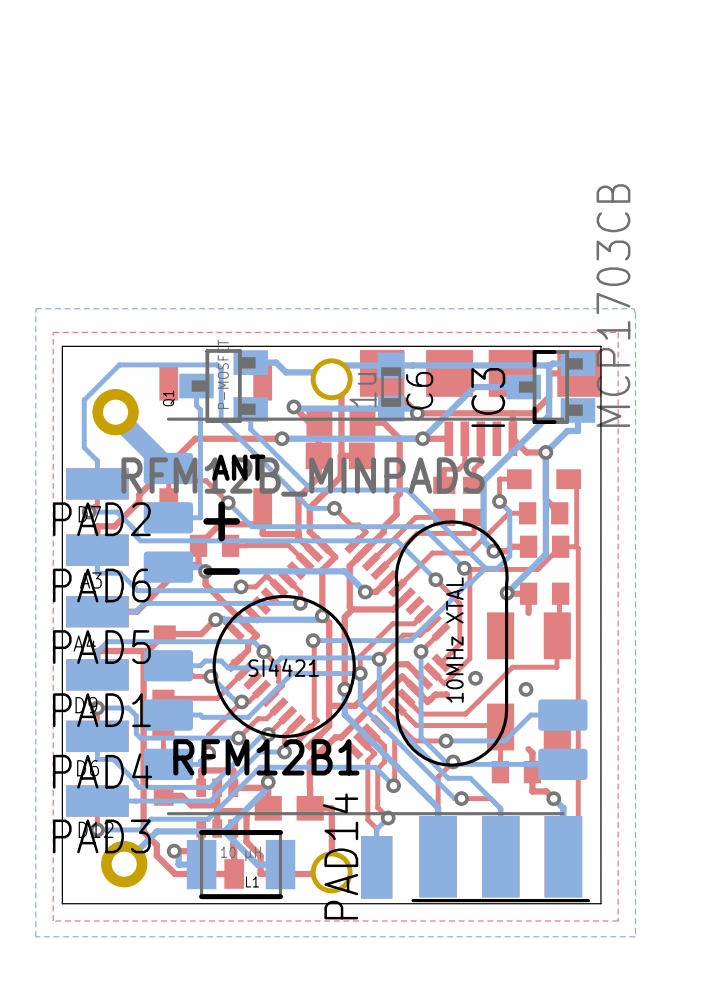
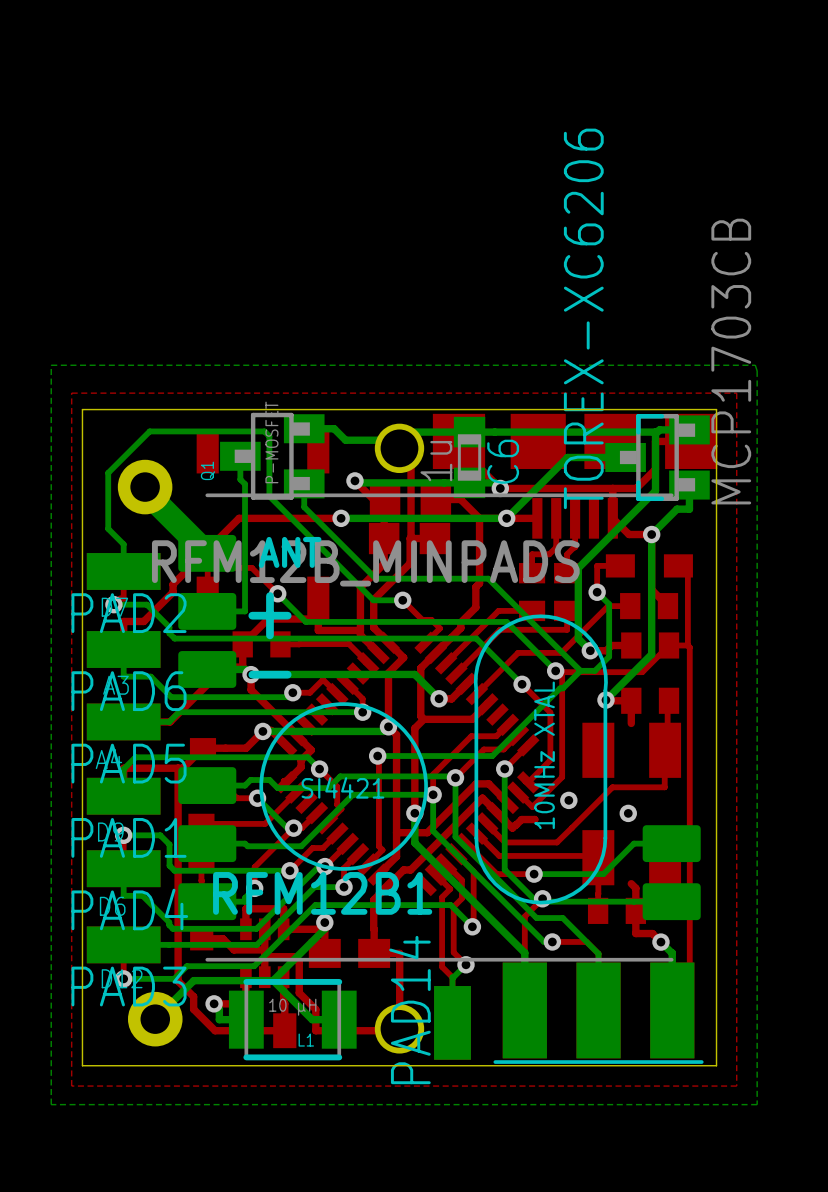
IC3 name: IC3 (488, 397) -> TOREX-XC6206 (583, 318)

